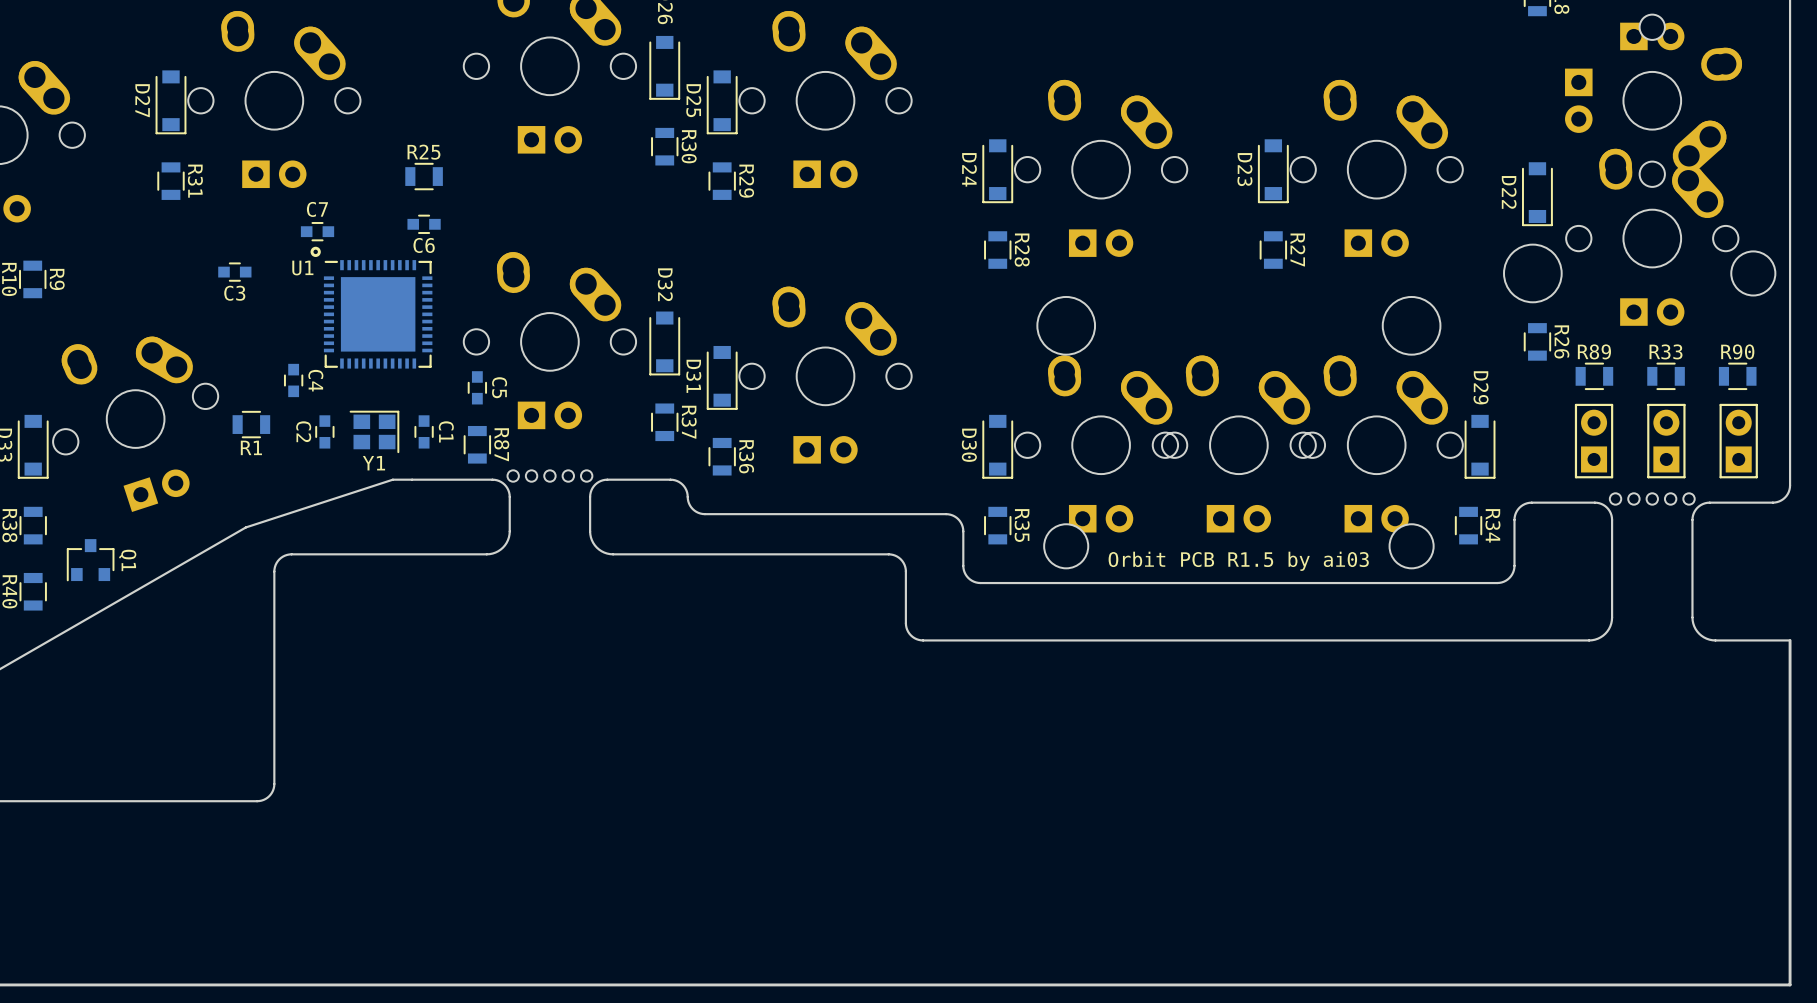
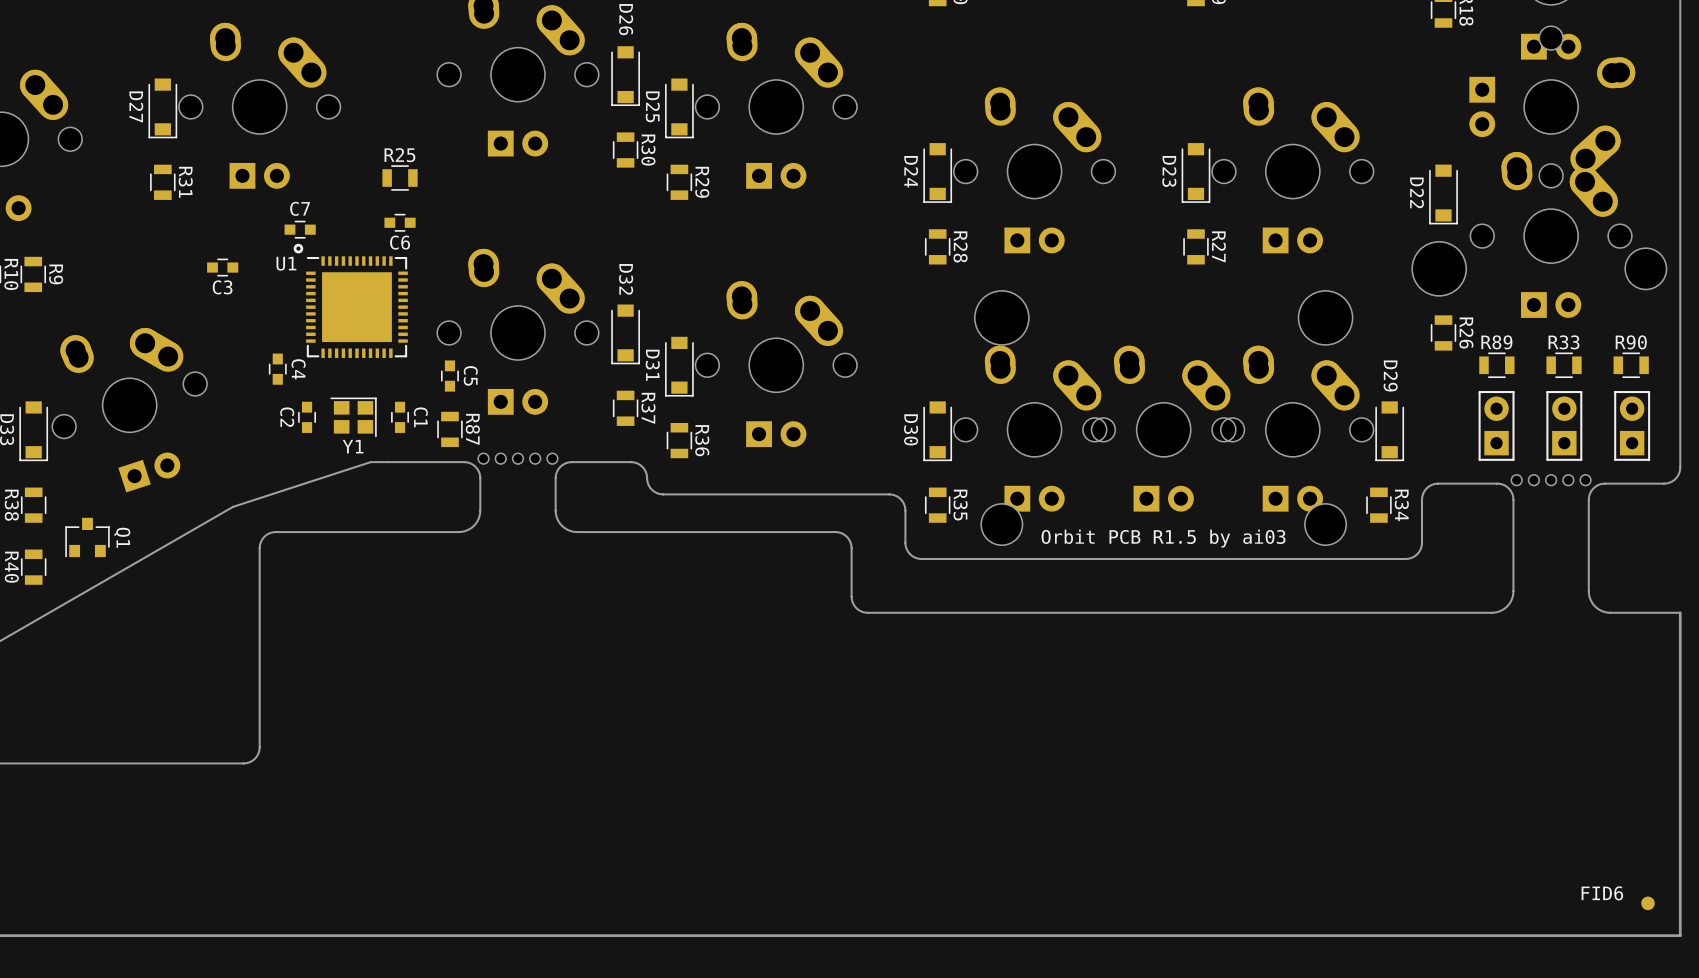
R1: (251, 424) -> none
FID6: none -> (1647, 903)

